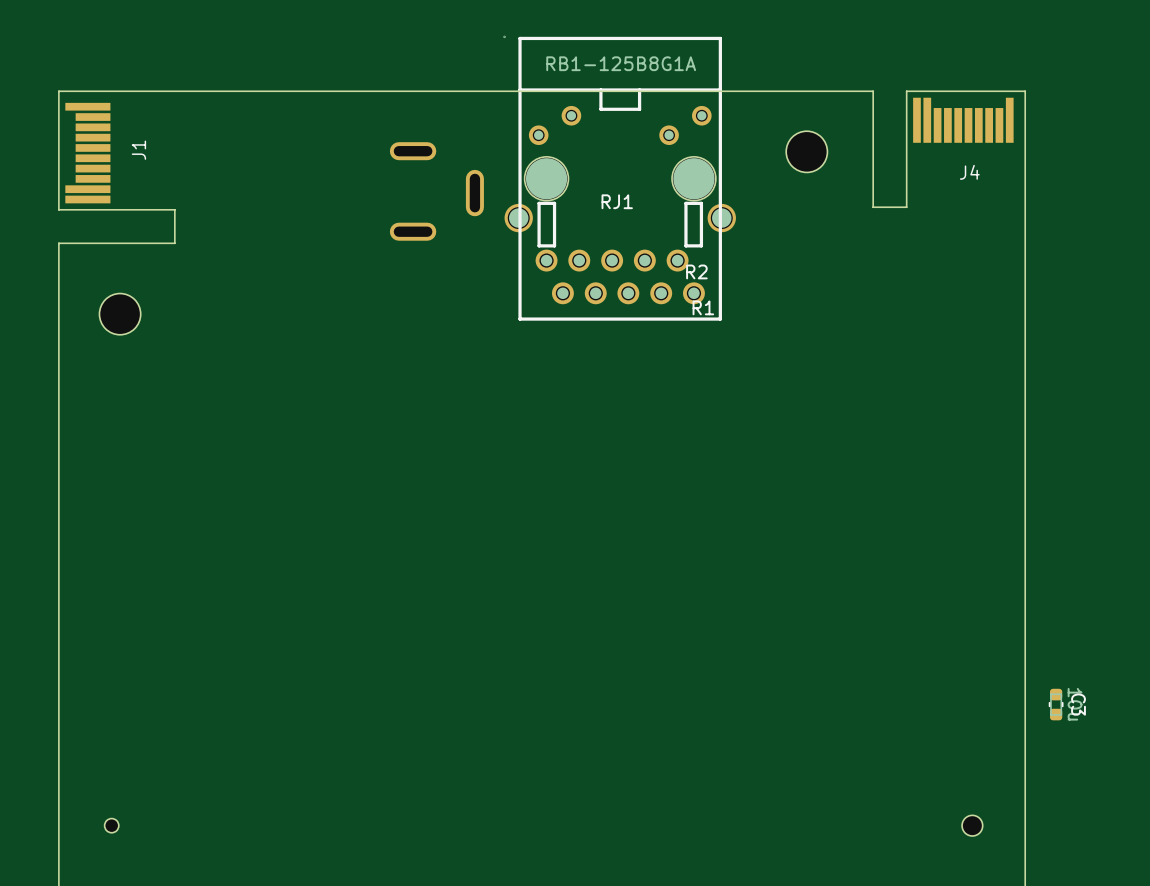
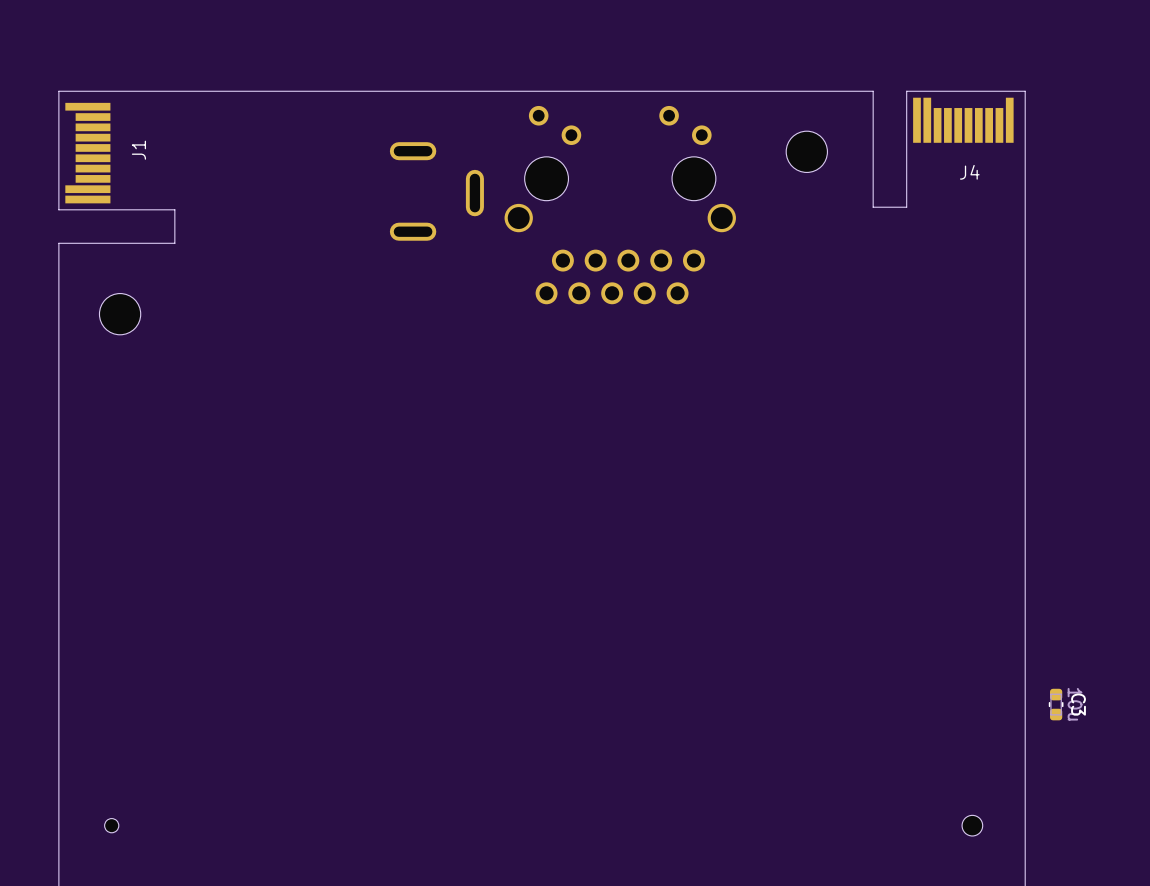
RJ1 side: bottom (619, 178) -> top (620, 205)

